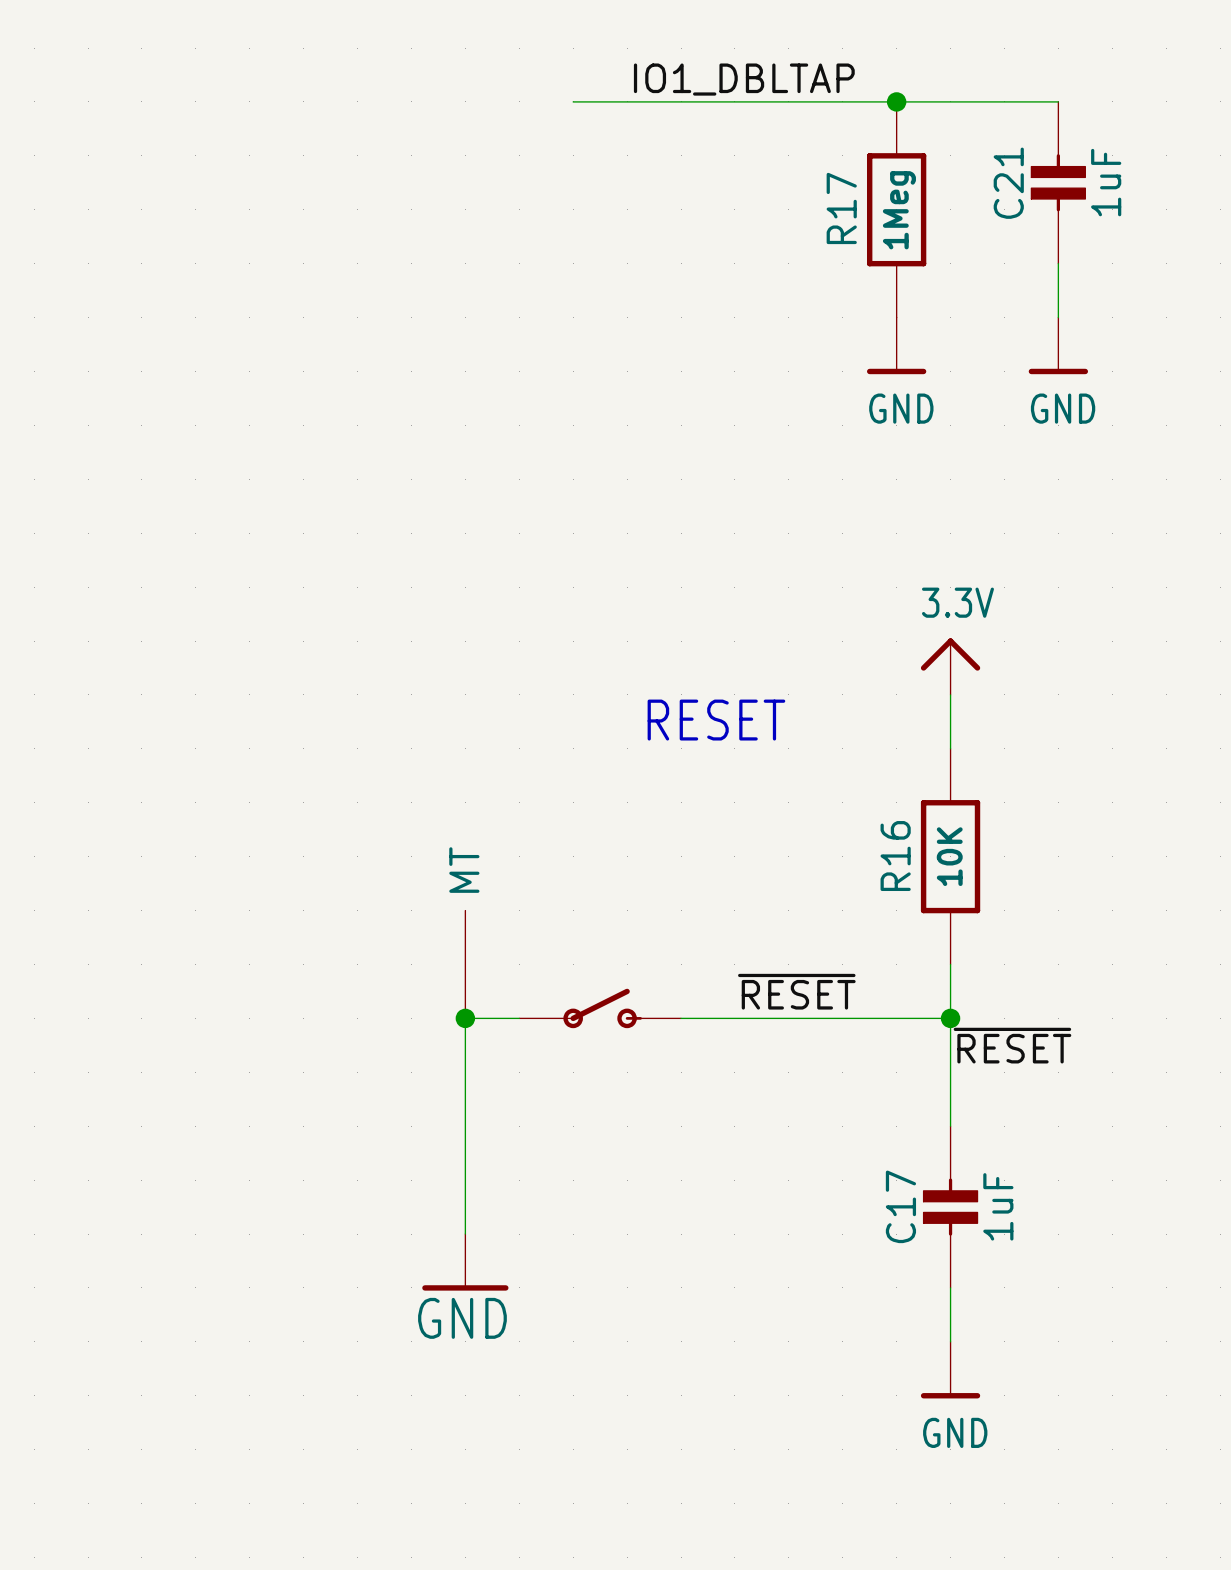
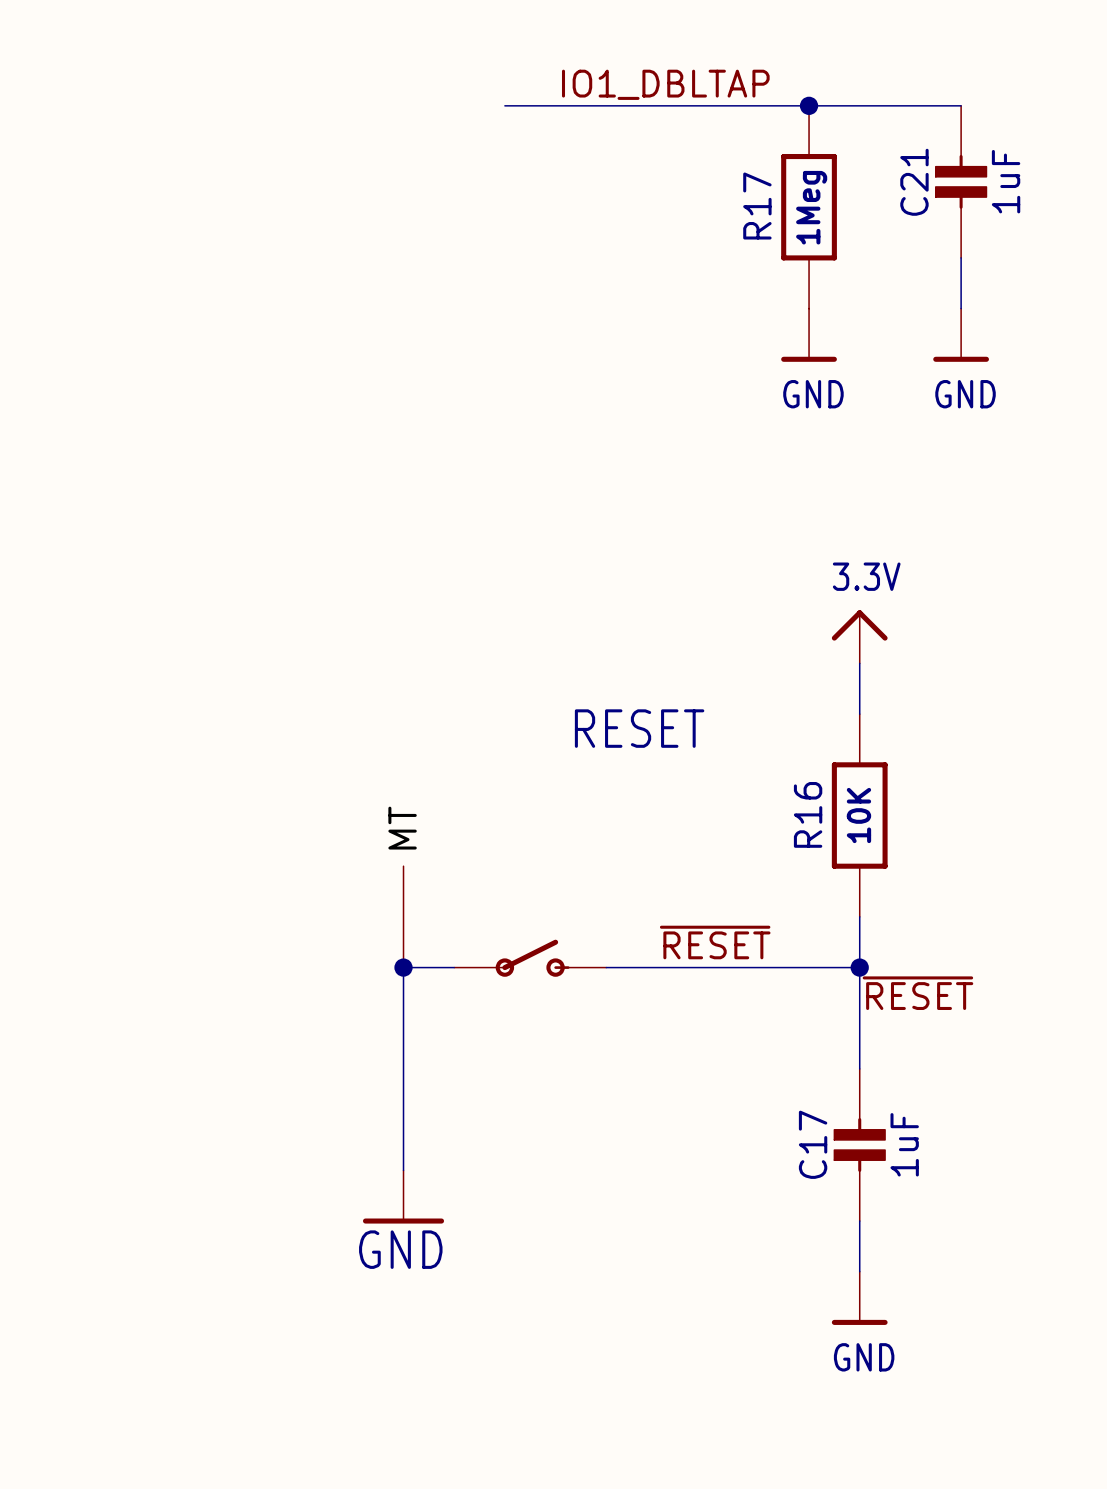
text position: RESET (716, 720) -> RESET (639, 728)

